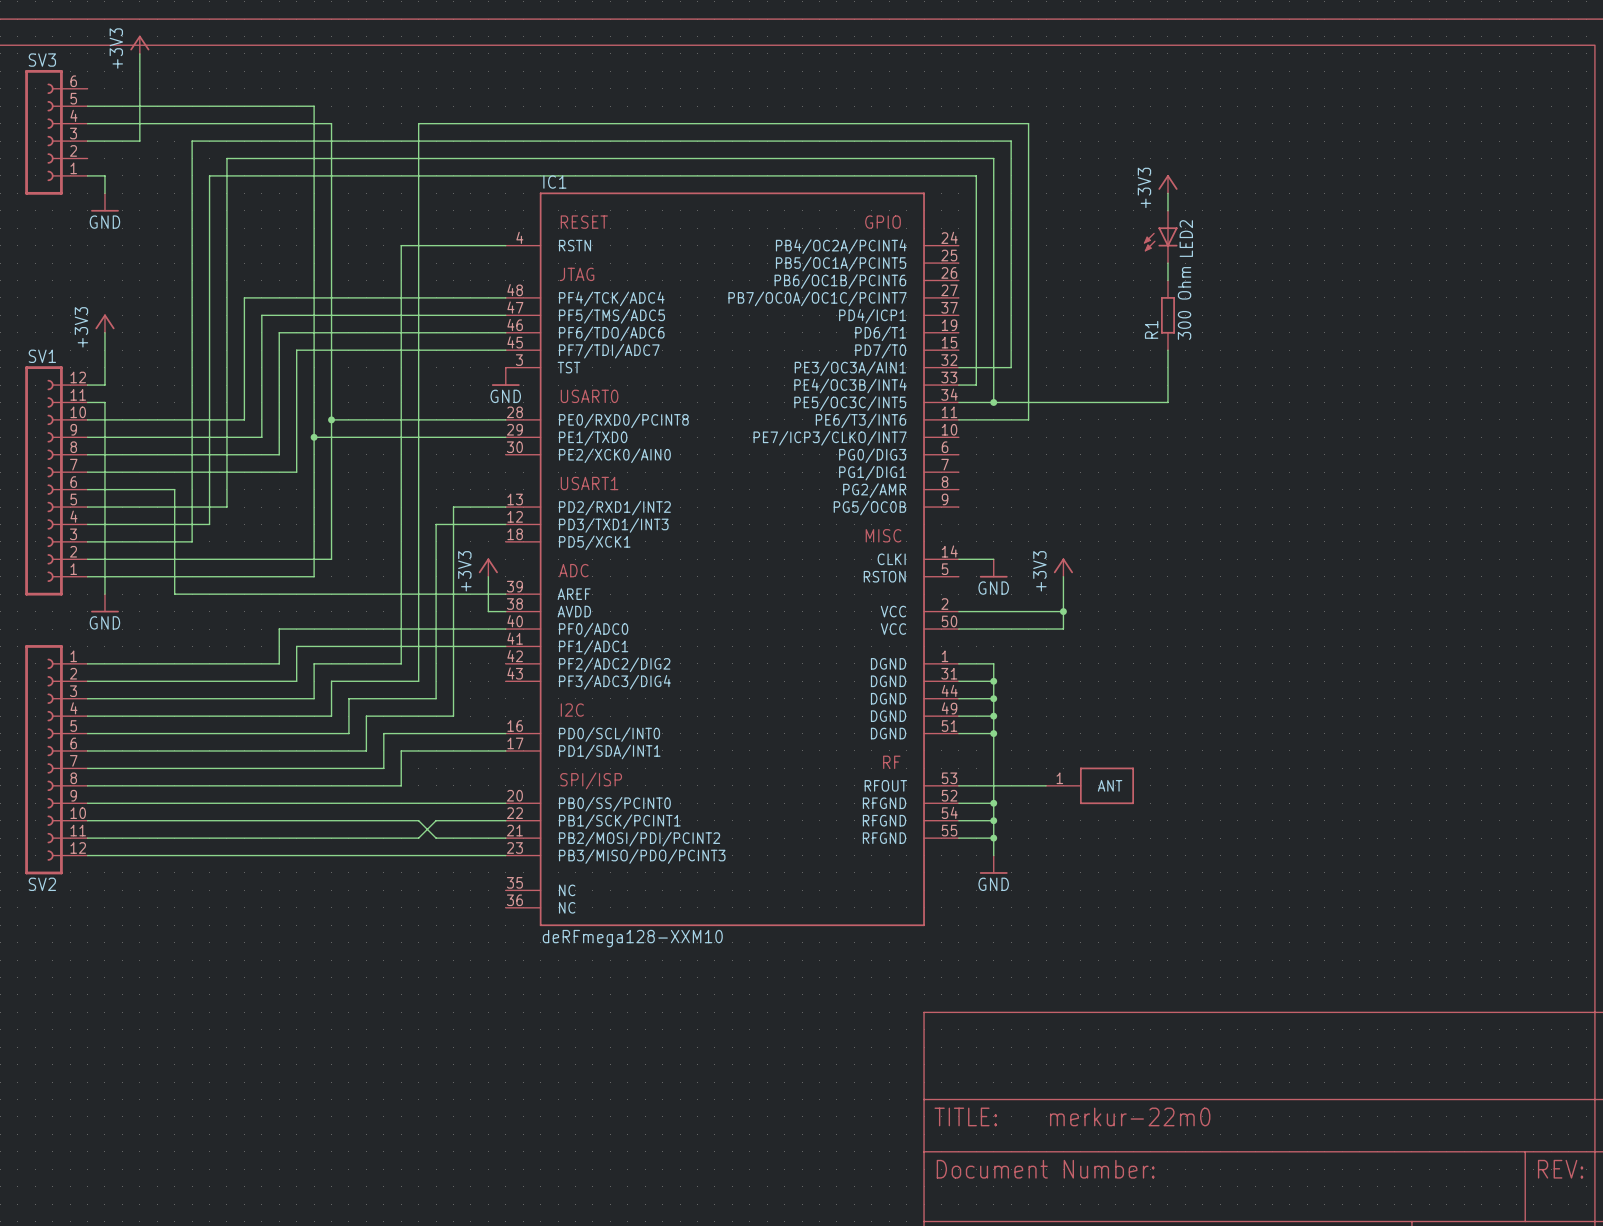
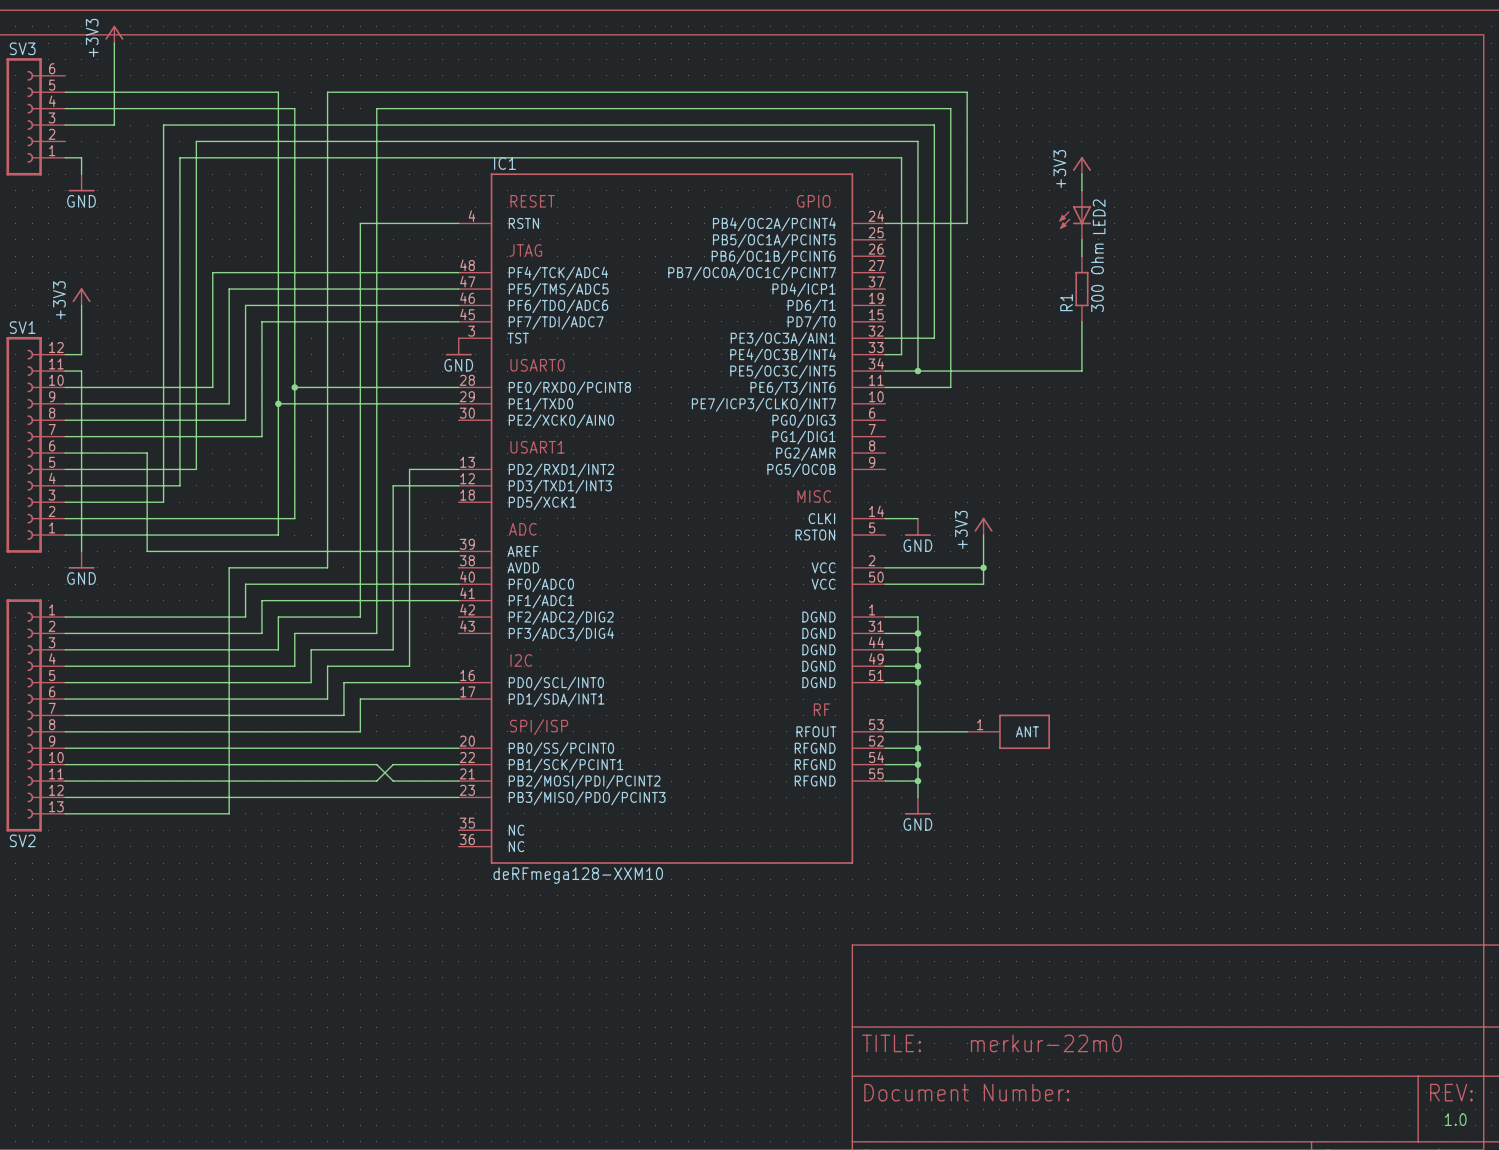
wire: none -> (885, 223) (967, 223) (967, 92) (327, 92) (327, 567) (229, 567) (229, 813) (65, 813)
power symbol: +3V3 (488, 567) -> none
wire: (488, 576) (488, 611) (505, 611) -> none
SV2 symbol: [25, 645, 88, 875] -> [6, 599, 66, 832]
text: none -> 1.0 (1455, 1119)

